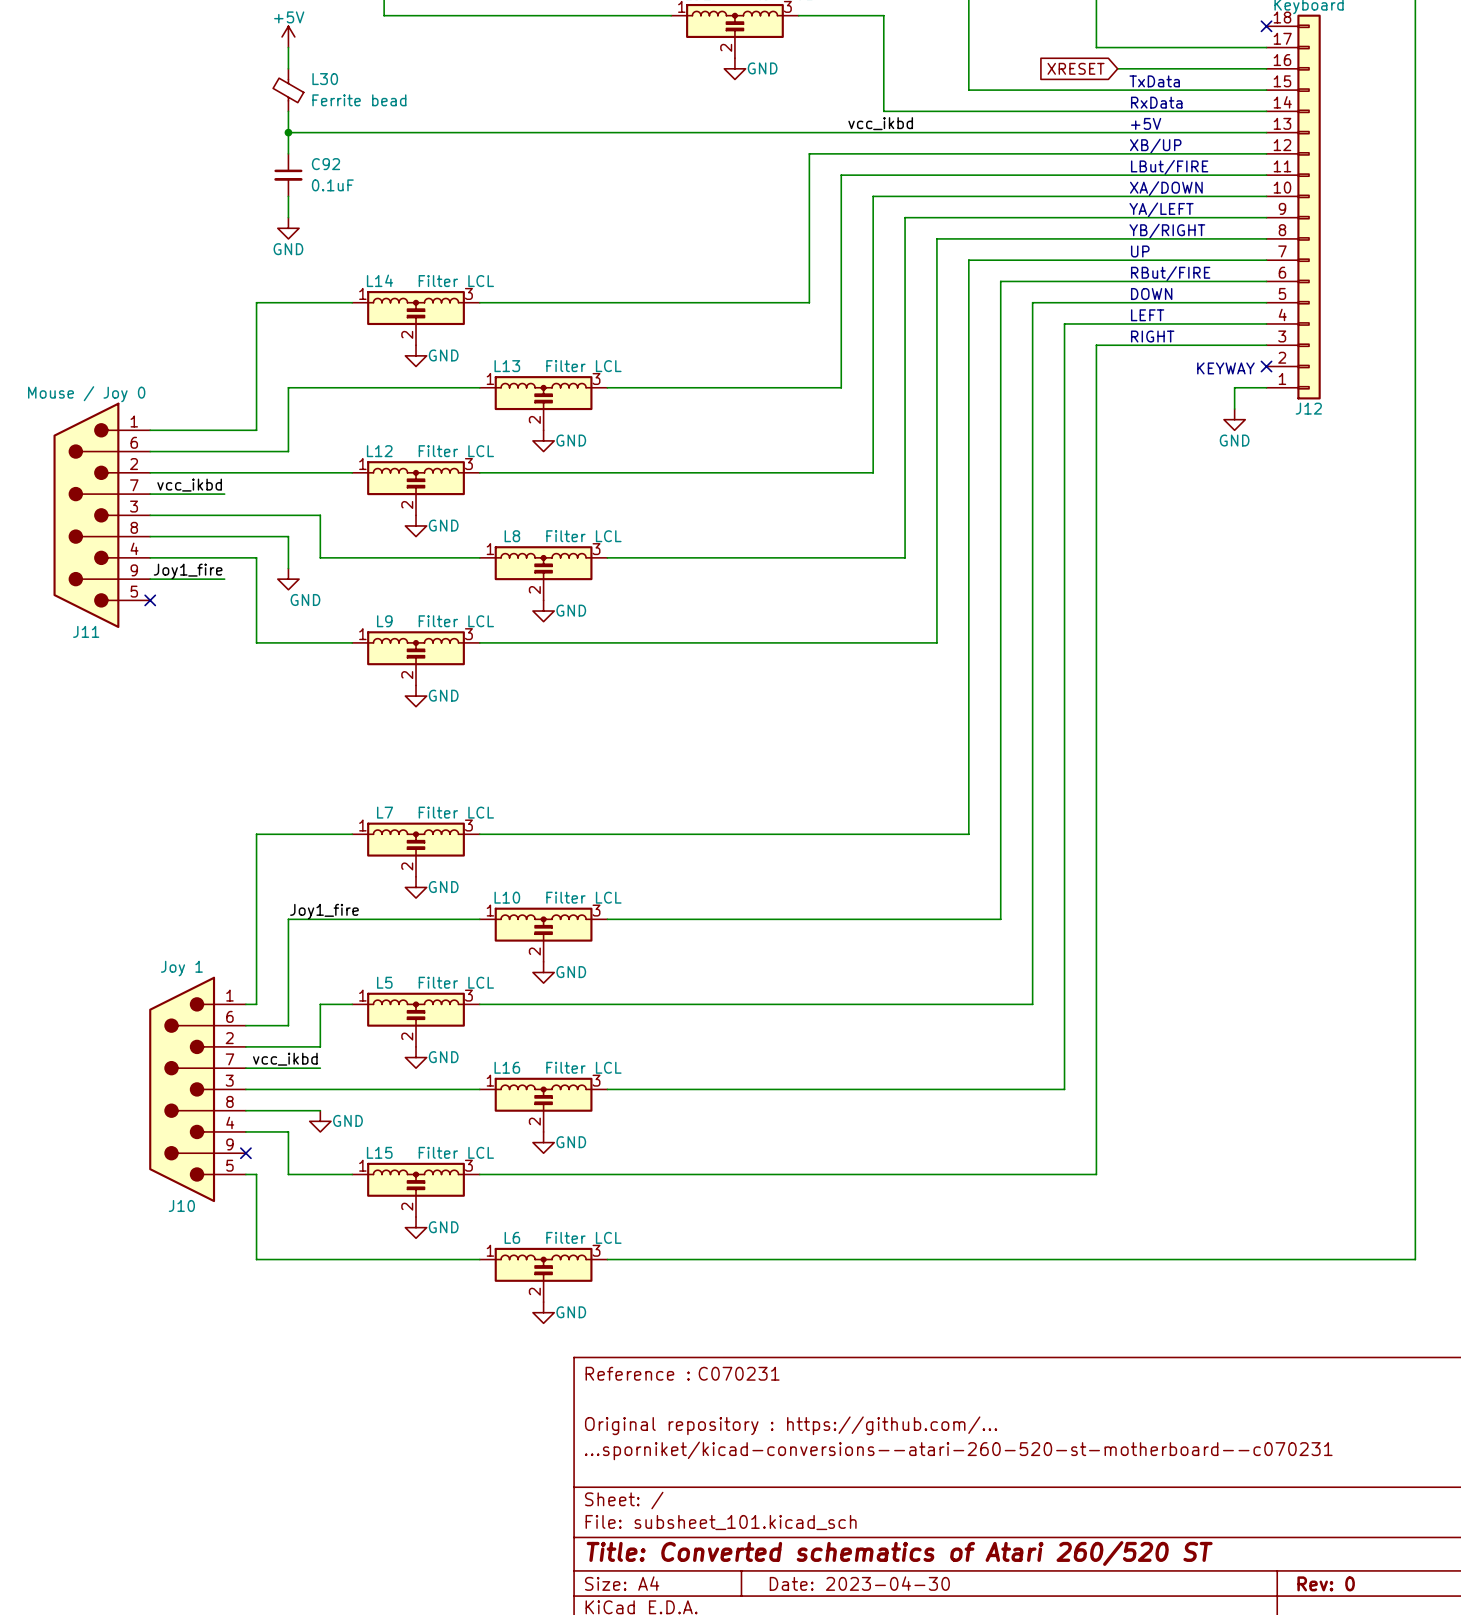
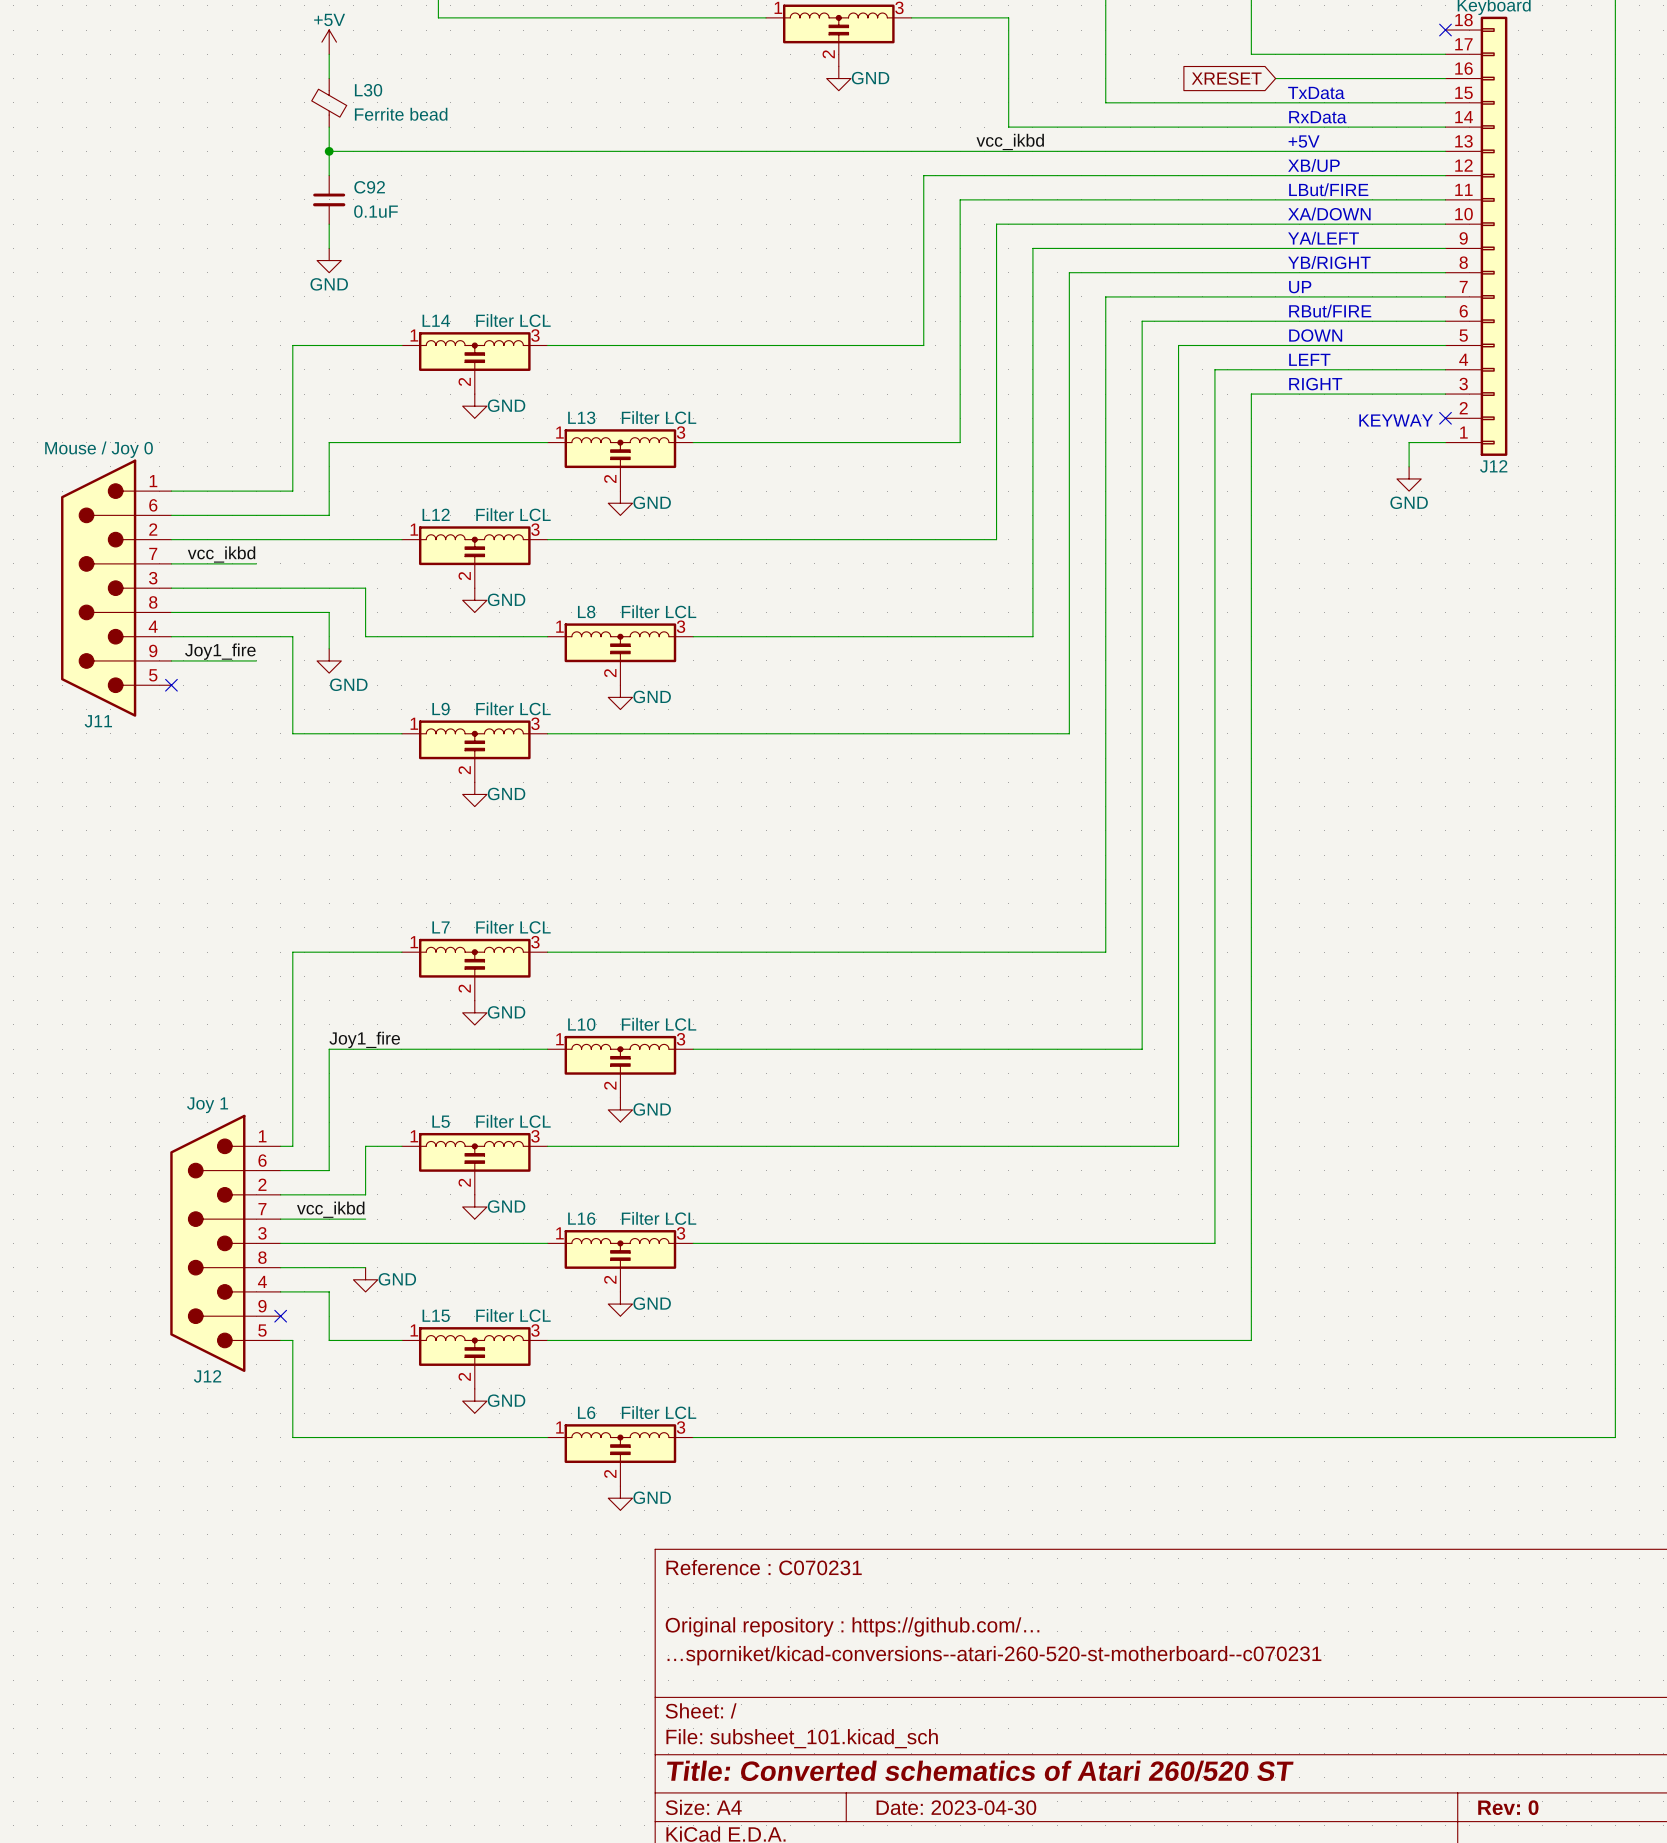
J10 name: J10 (181, 1205) -> J12 (207, 1376)

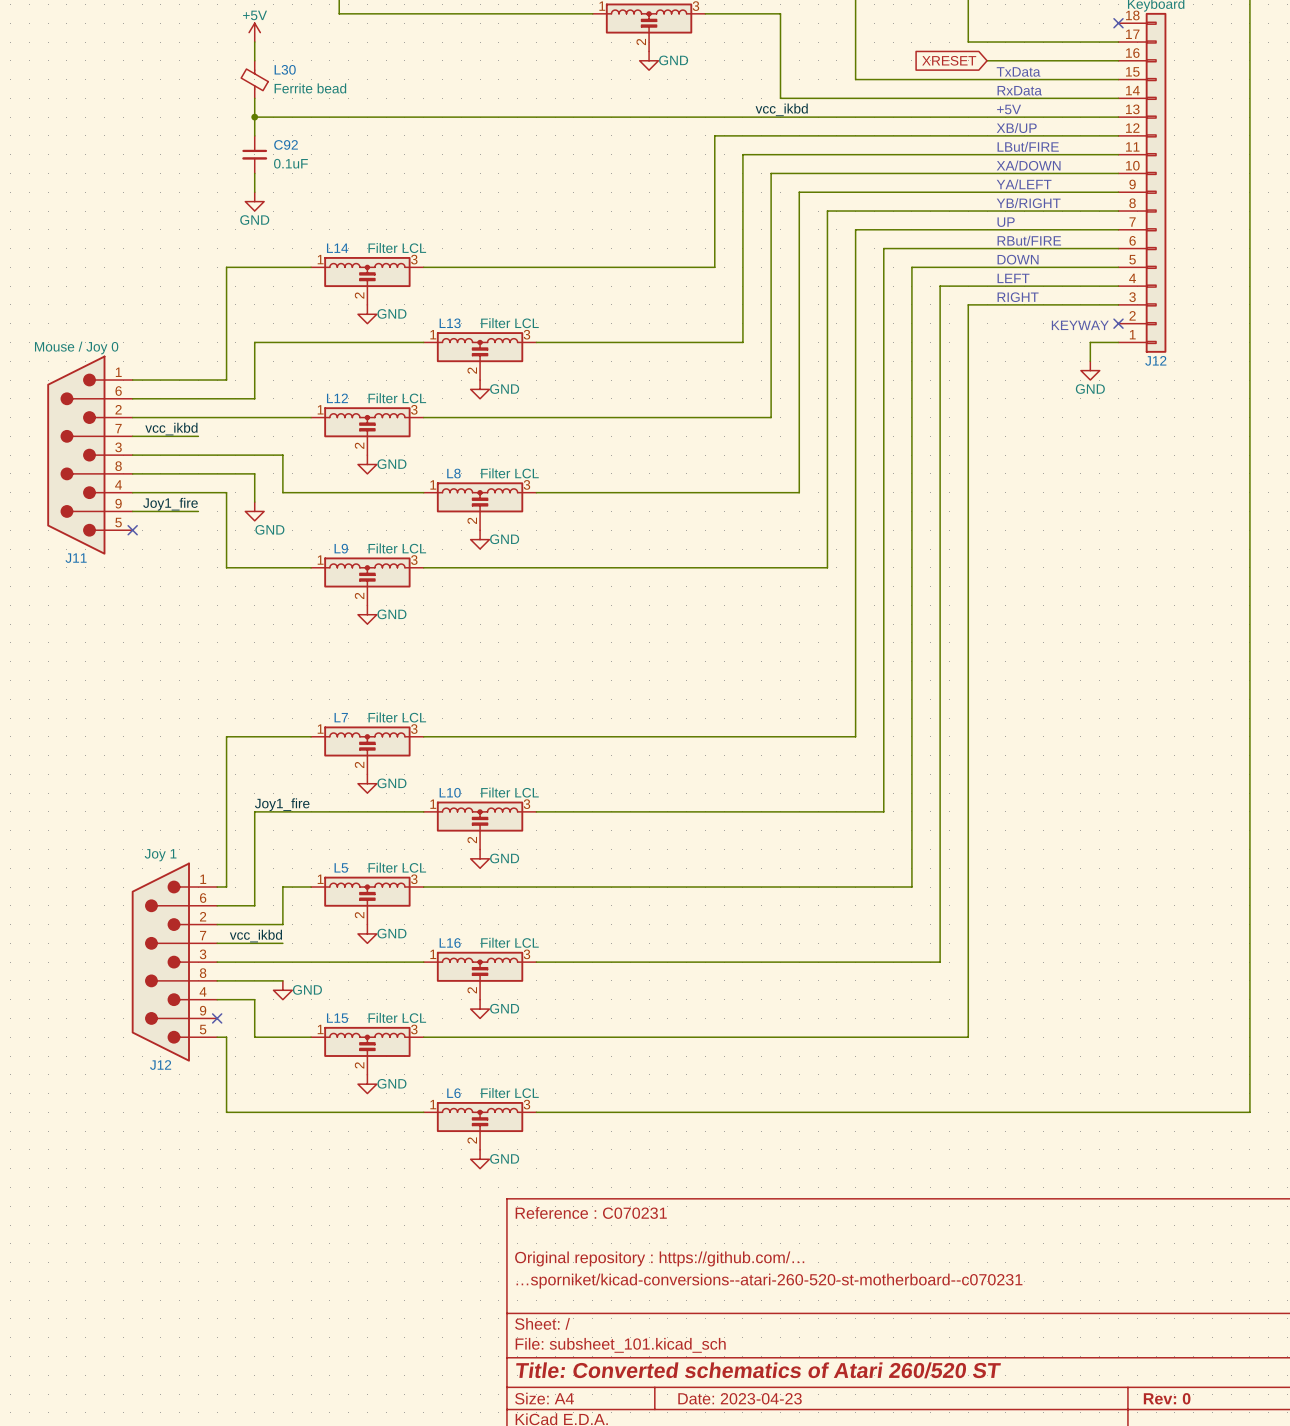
title block: Date: 2023-04-30 (956, 1807) -> Date: 2023-04-23 (740, 1398)

